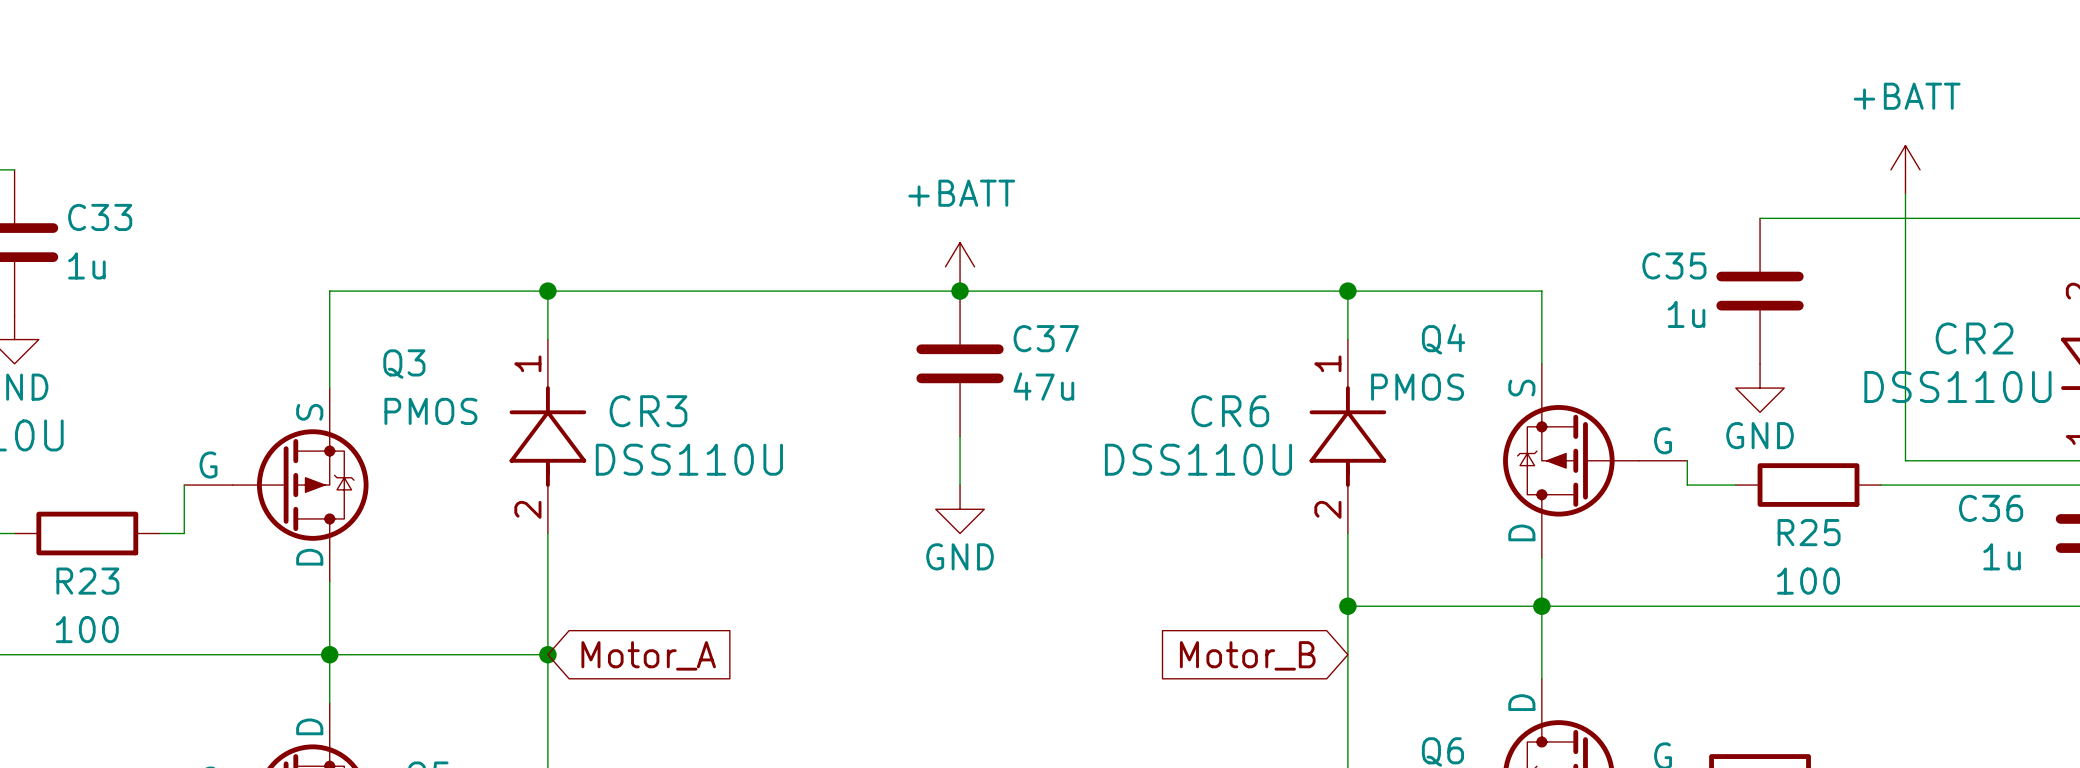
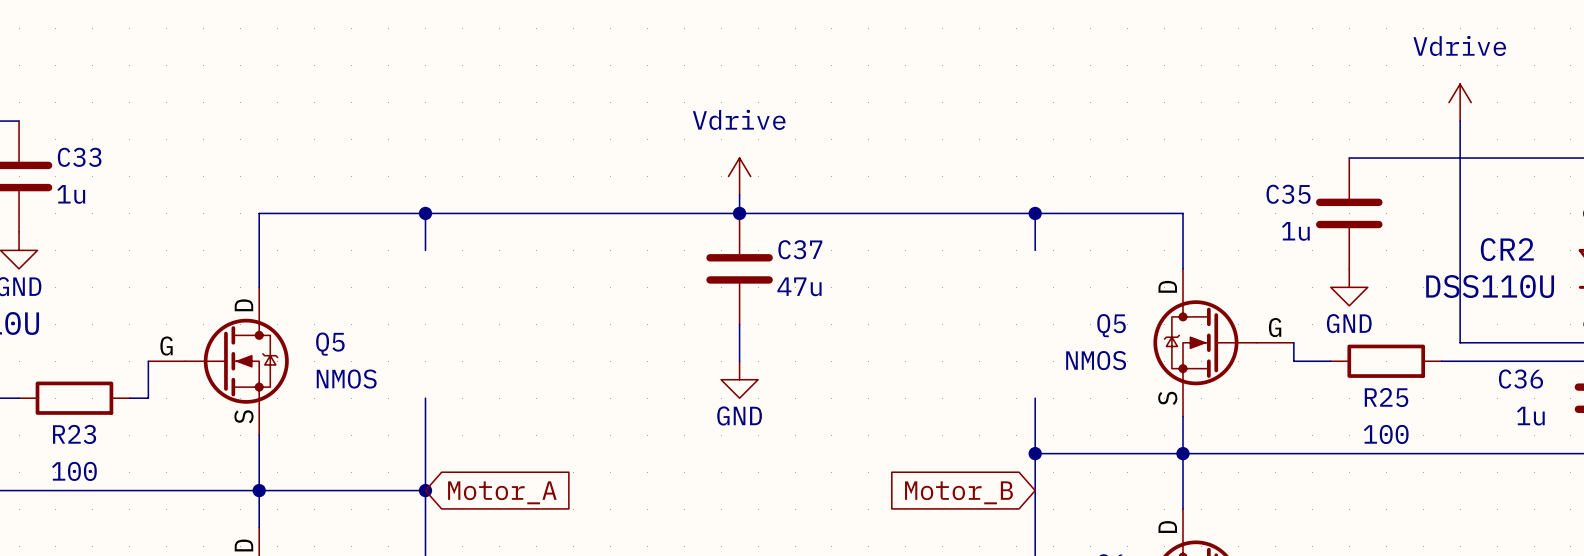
power symbol: none -> Vdrive (1460, 102)
power symbol: +BATT (1905, 169) -> none
power symbol: none -> Vdrive (739, 176)
power symbol: +BATT (960, 266) -> none
CR3: DSS110U (547, 436) -> none
CR6: DSS110U (1347, 436) -> none
Q4: PMOS (1595, 460) -> none
Q5: none -> NMOS (1223, 342)
Q3: PMOS (276, 485) -> none
Q5: none -> NMOS (218, 361)

